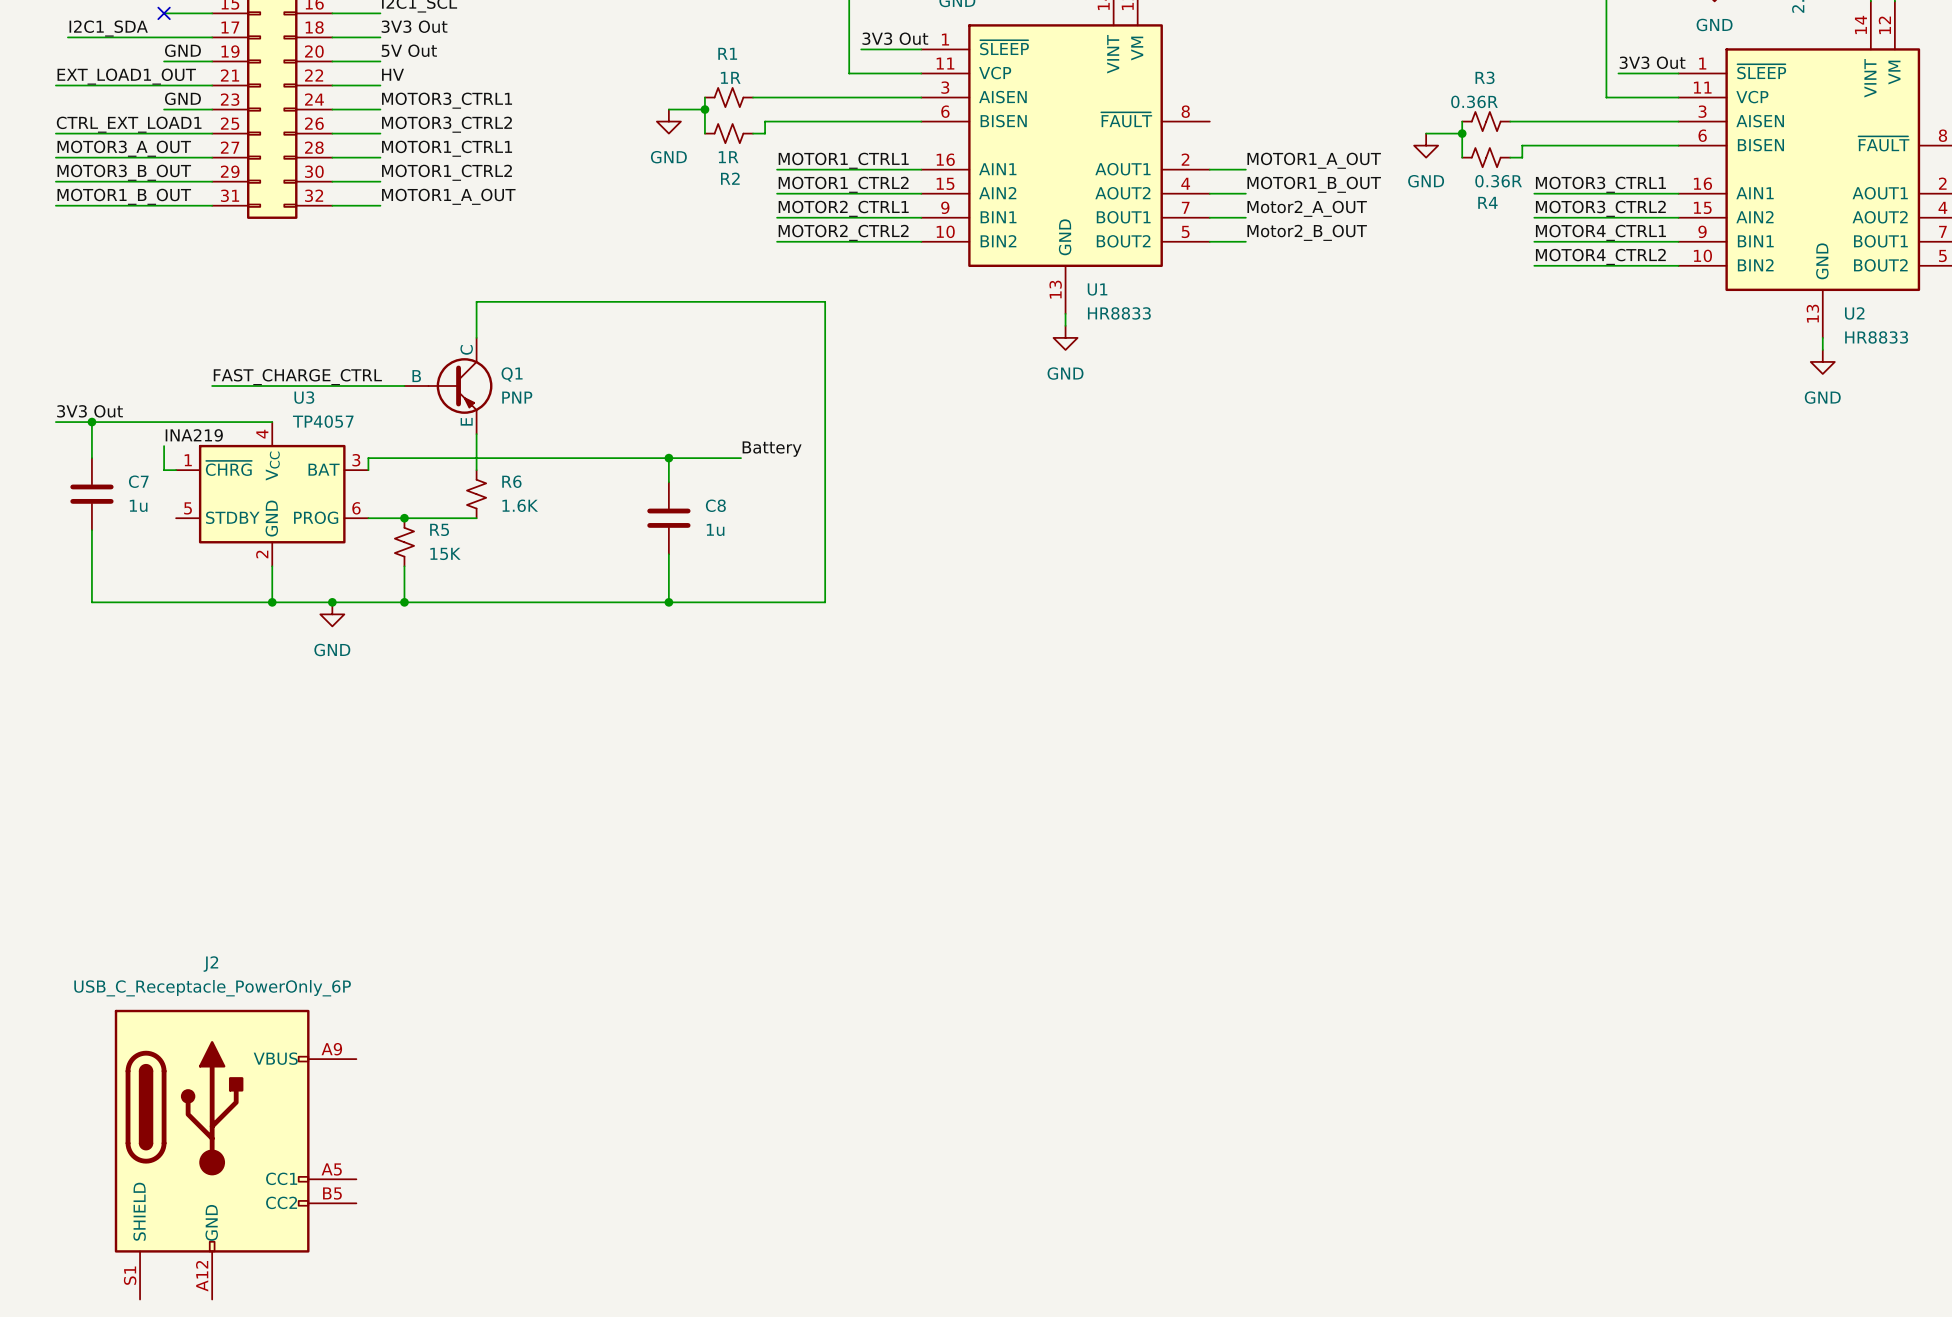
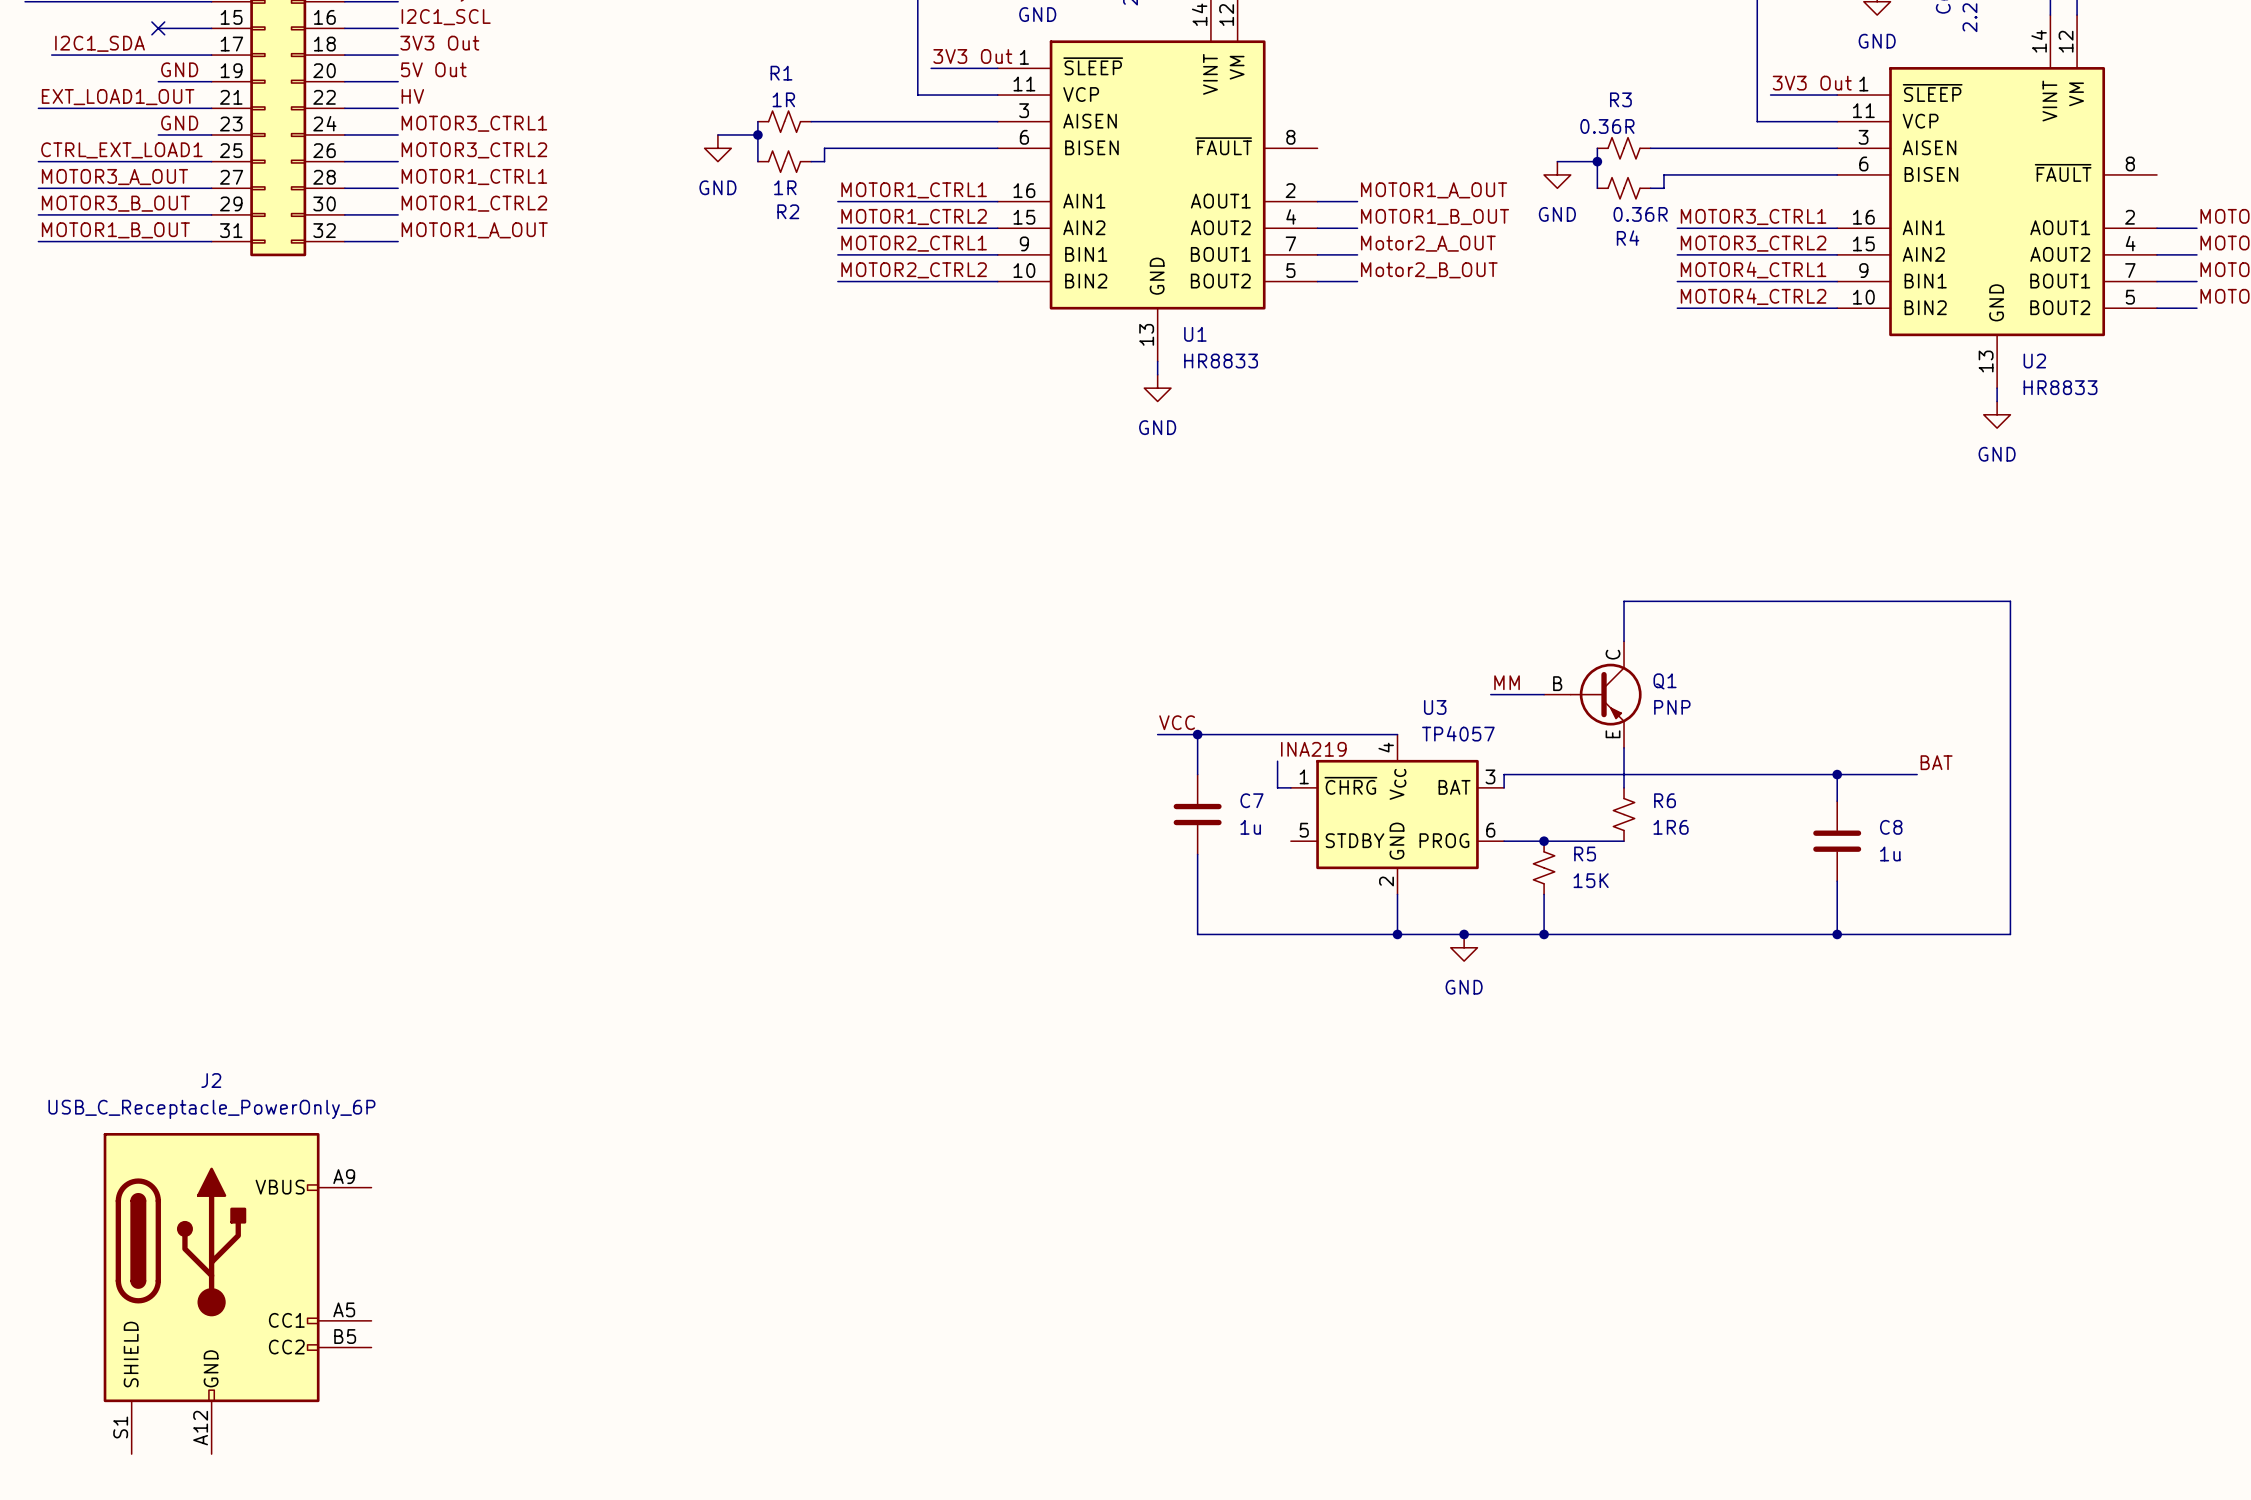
wire: (476, 337) (476, 301) (825, 301) (825, 602) (91, 602) (91, 530) -> none
label: FAST_CHARGE_CTRL (297, 377) -> none
wire: (212, 386) (404, 386) -> none
Q1 position: (448, 386) -> (1592, 694)
label: 3V3 Out (90, 411) -> none
wire: (55, 422) (272, 422) -> none
wire: (91, 422) (91, 458) -> none
junction: (91, 422) -> none
wire: (476, 434) (476, 470) -> none
label: INA219 (194, 435) -> none
wire: (164, 446) (164, 470) (176, 470) -> none
label: Battery (772, 449) -> none
wire: (668, 458) (668, 482) -> none
junction: (668, 458) -> none
wire: (741, 458) (368, 458) (368, 470) -> none
C7 position: (91, 494) -> (1197, 814)
U3 position: (272, 494) -> (1397, 814)
R6 position: (476, 494) -> (1624, 814)
R6 value: 1.6K (520, 505) -> 1R6 (1671, 827)
wire: (368, 518) (476, 518) -> none
junction: (404, 518) -> none
C8 position: (668, 518) -> (1837, 841)
R5 position: (404, 542) -> (1544, 867)
wire: (668, 554) (668, 602) -> none
wire: (272, 566) (272, 602) -> none
wire: (404, 566) (404, 602) -> none
wire: none -> (1624, 641) (1624, 601) (2010, 601) (2010, 934) (1197, 934) (1197, 854)
junction: (272, 602) -> none
junction: (332, 602) -> none
junction: (404, 602) -> none
junction: (668, 602) -> none
label: none -> MM (1507, 682)
power symbol: GND (332, 614) -> none
wire: none -> (1490, 694) (1544, 694)
label: none -> VCC (1177, 722)
wire: none -> (1157, 734) (1397, 734)
wire: none -> (1197, 734) (1197, 774)
junction: none -> (1197, 734)
wire: none -> (1624, 747) (1624, 787)
label: none -> INA219 (1313, 749)
wire: none -> (1277, 761) (1277, 787) (1290, 787)
label: none -> BAT (1936, 762)
wire: none -> (1837, 774) (1837, 801)
junction: none -> (1837, 774)
wire: none -> (1917, 774) (1504, 774) (1504, 787)
wire: none -> (1504, 841) (1624, 841)
junction: none -> (1544, 841)
wire: none -> (1837, 881) (1837, 934)
wire: none -> (1397, 894) (1397, 934)
wire: none -> (1544, 894) (1544, 934)
junction: none -> (1397, 934)
junction: none -> (1464, 934)
junction: none -> (1544, 934)
junction: none -> (1837, 934)
power symbol: none -> GND (1464, 947)

